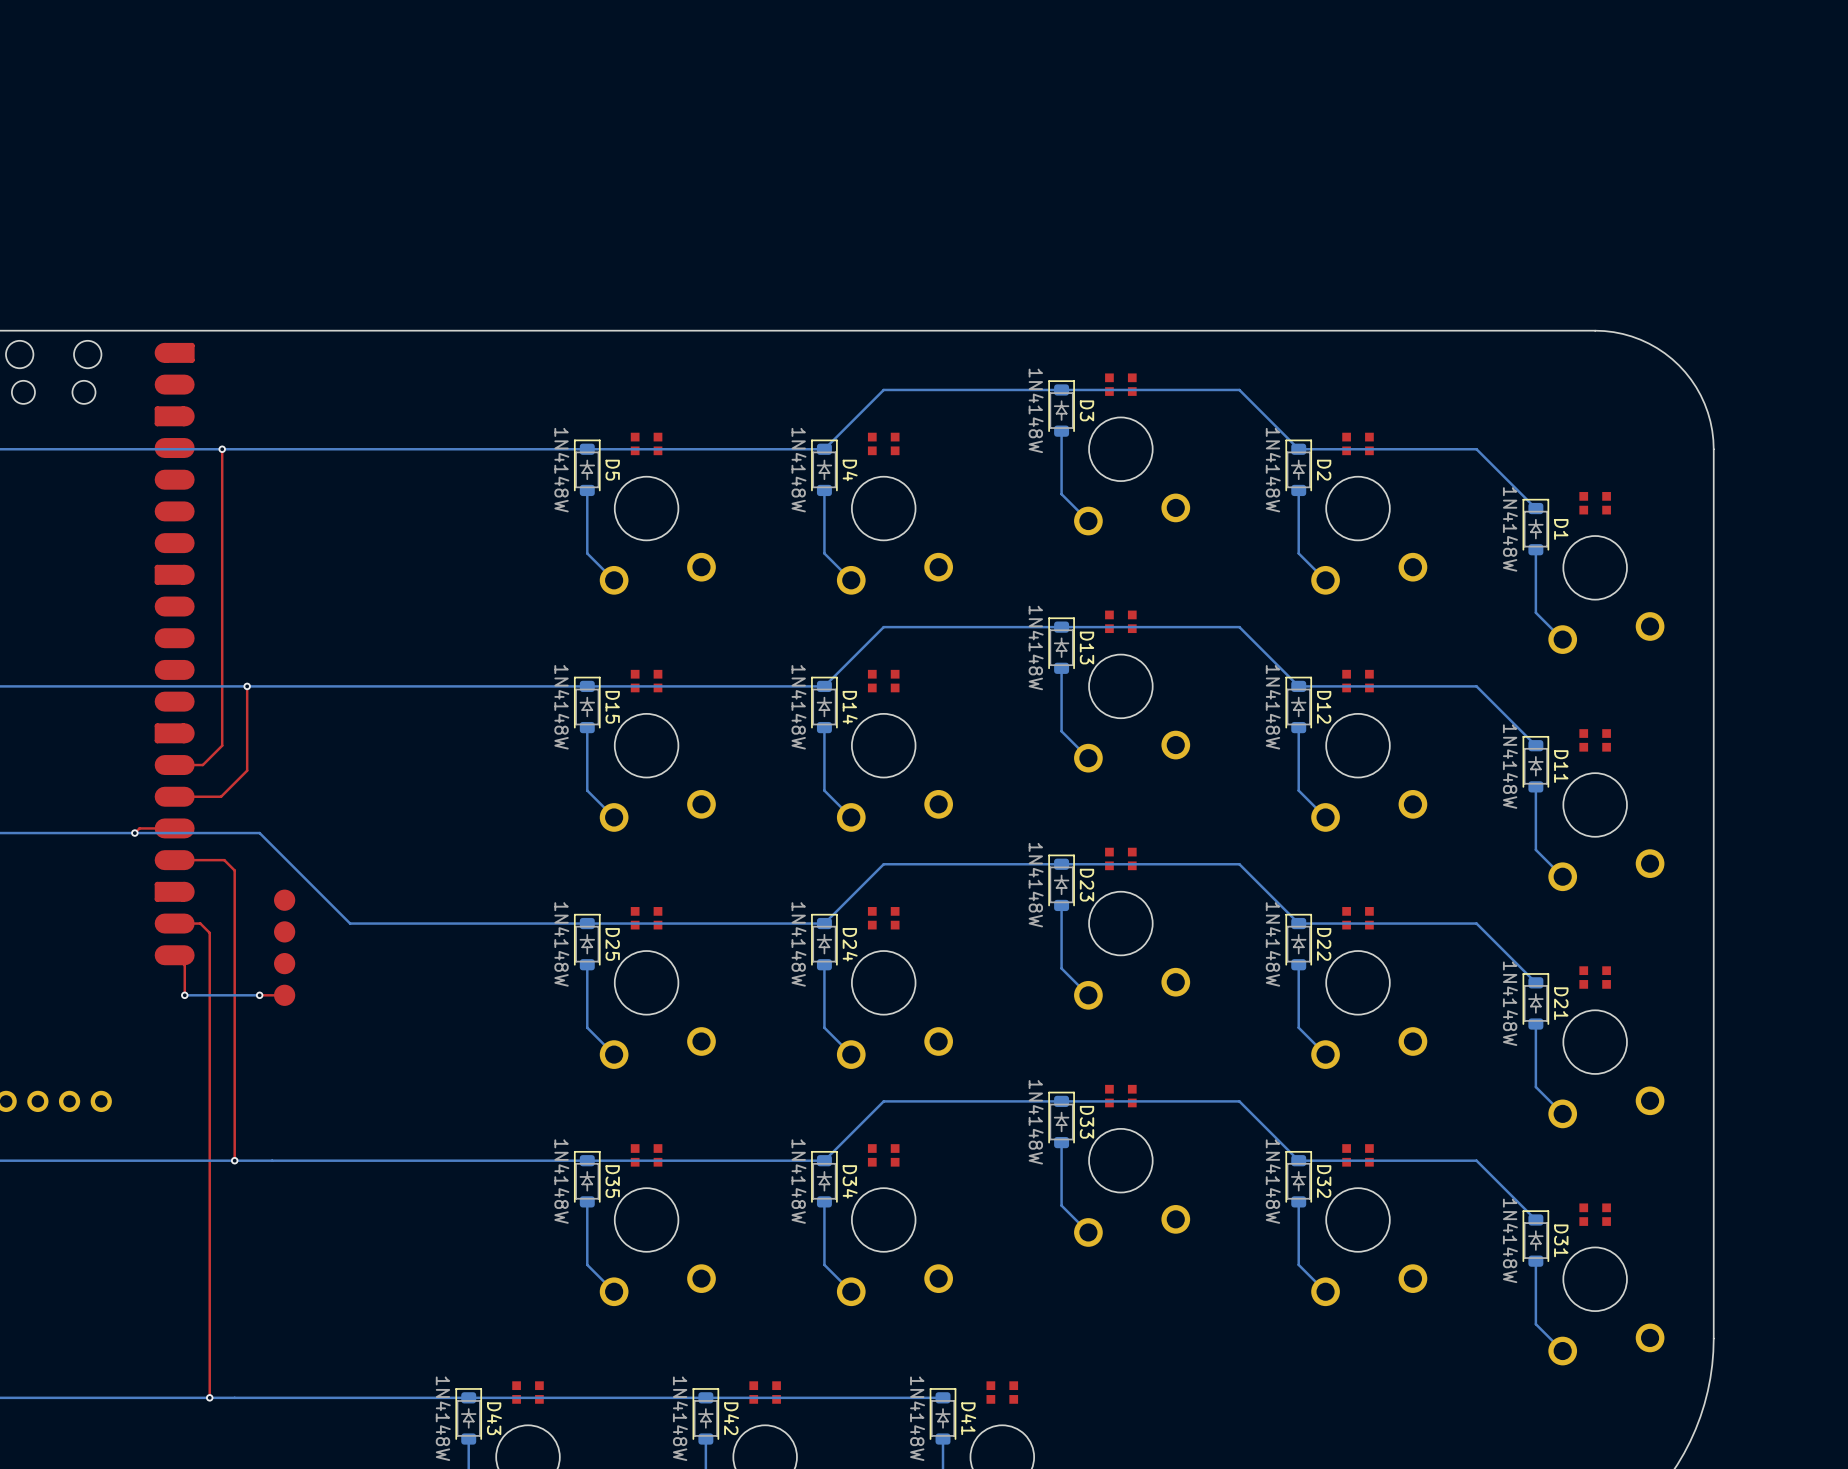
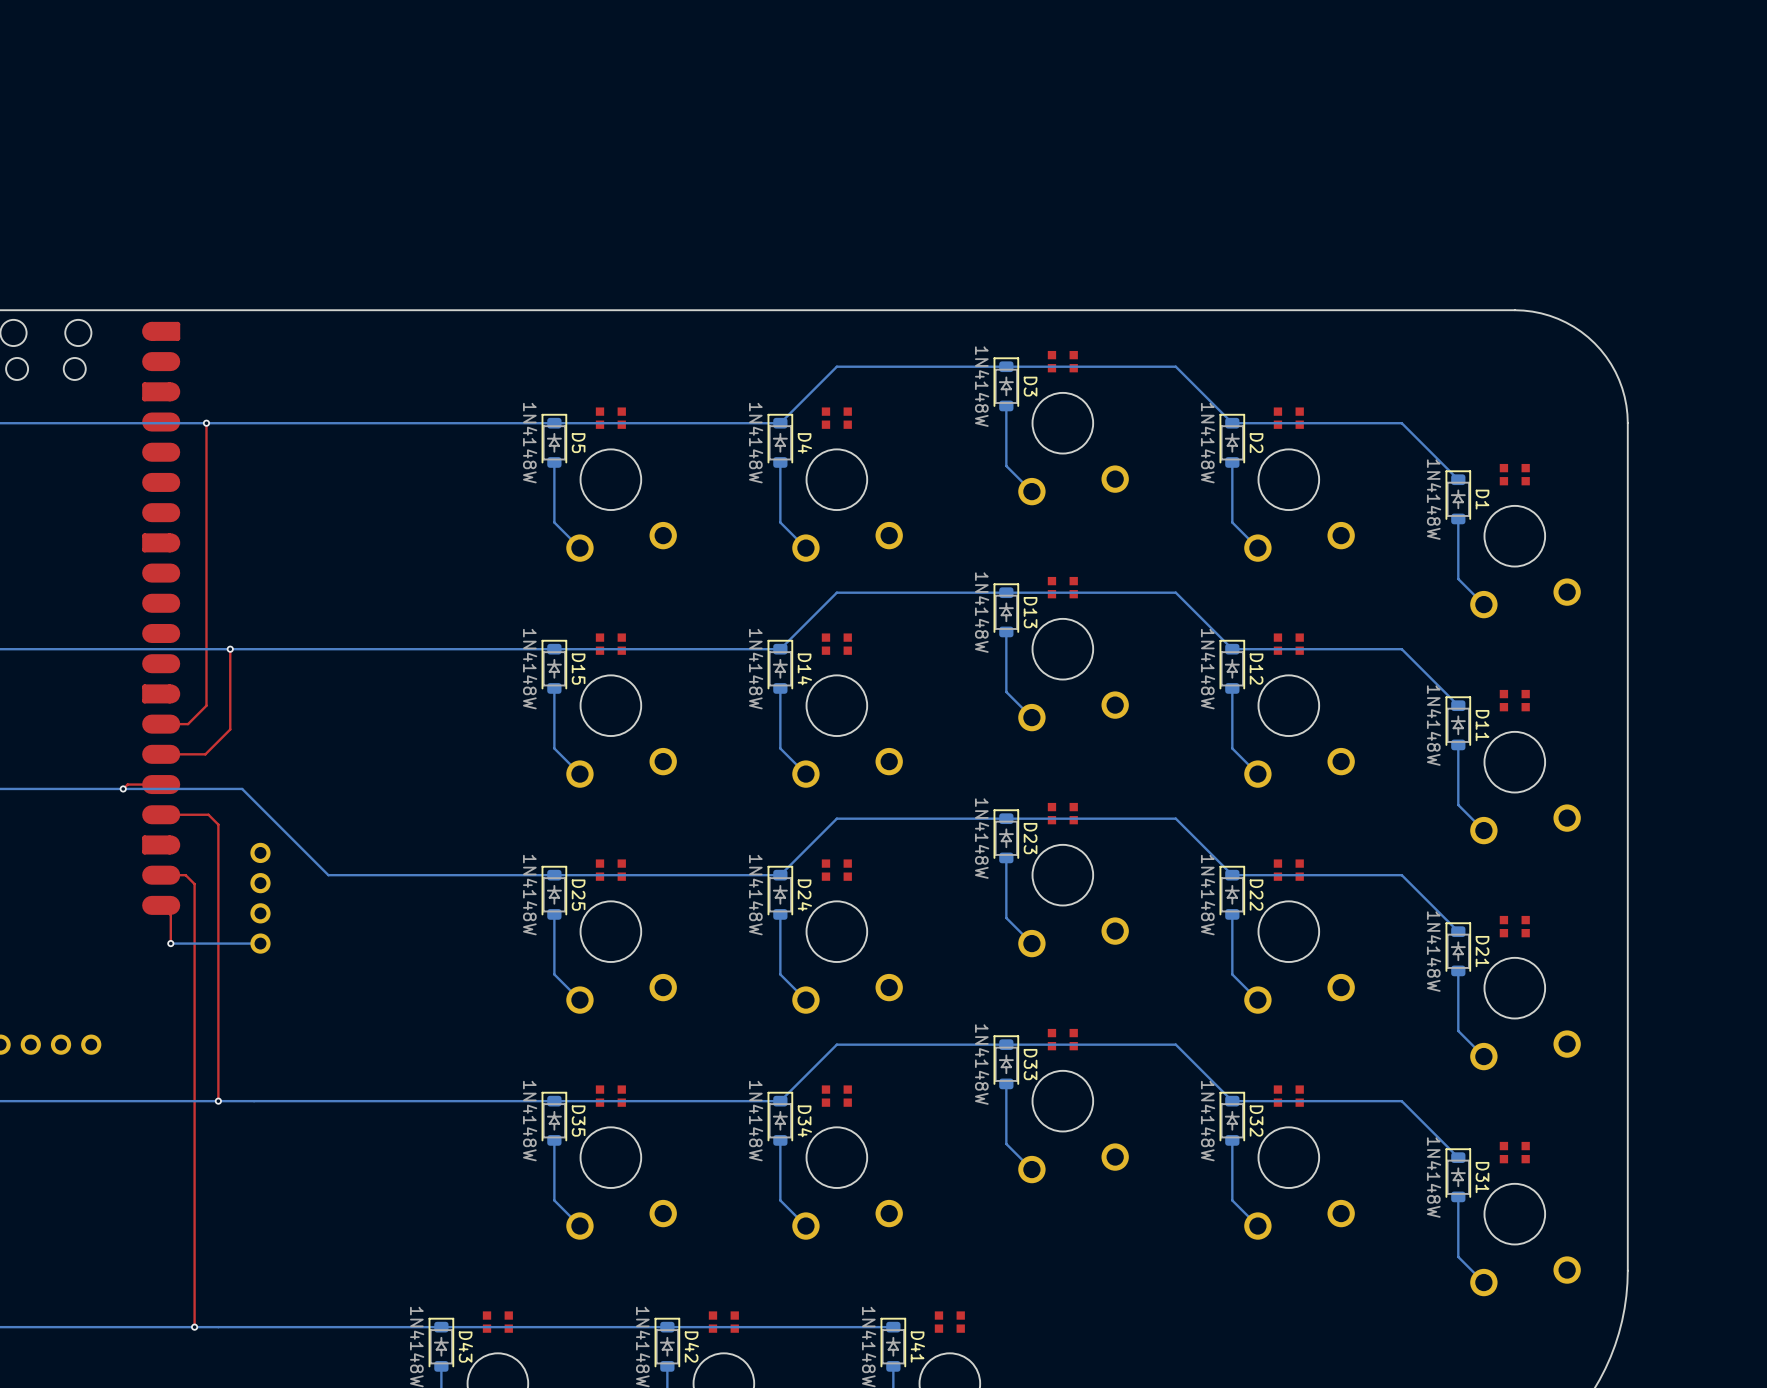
part footprint: [274, 889, 296, 1006] -> [250, 842, 271, 954]
via: (259, 995) -> none
bottom track: none -> (260, 943) (242, 943)
top track: (284, 995) (259, 995) -> none

